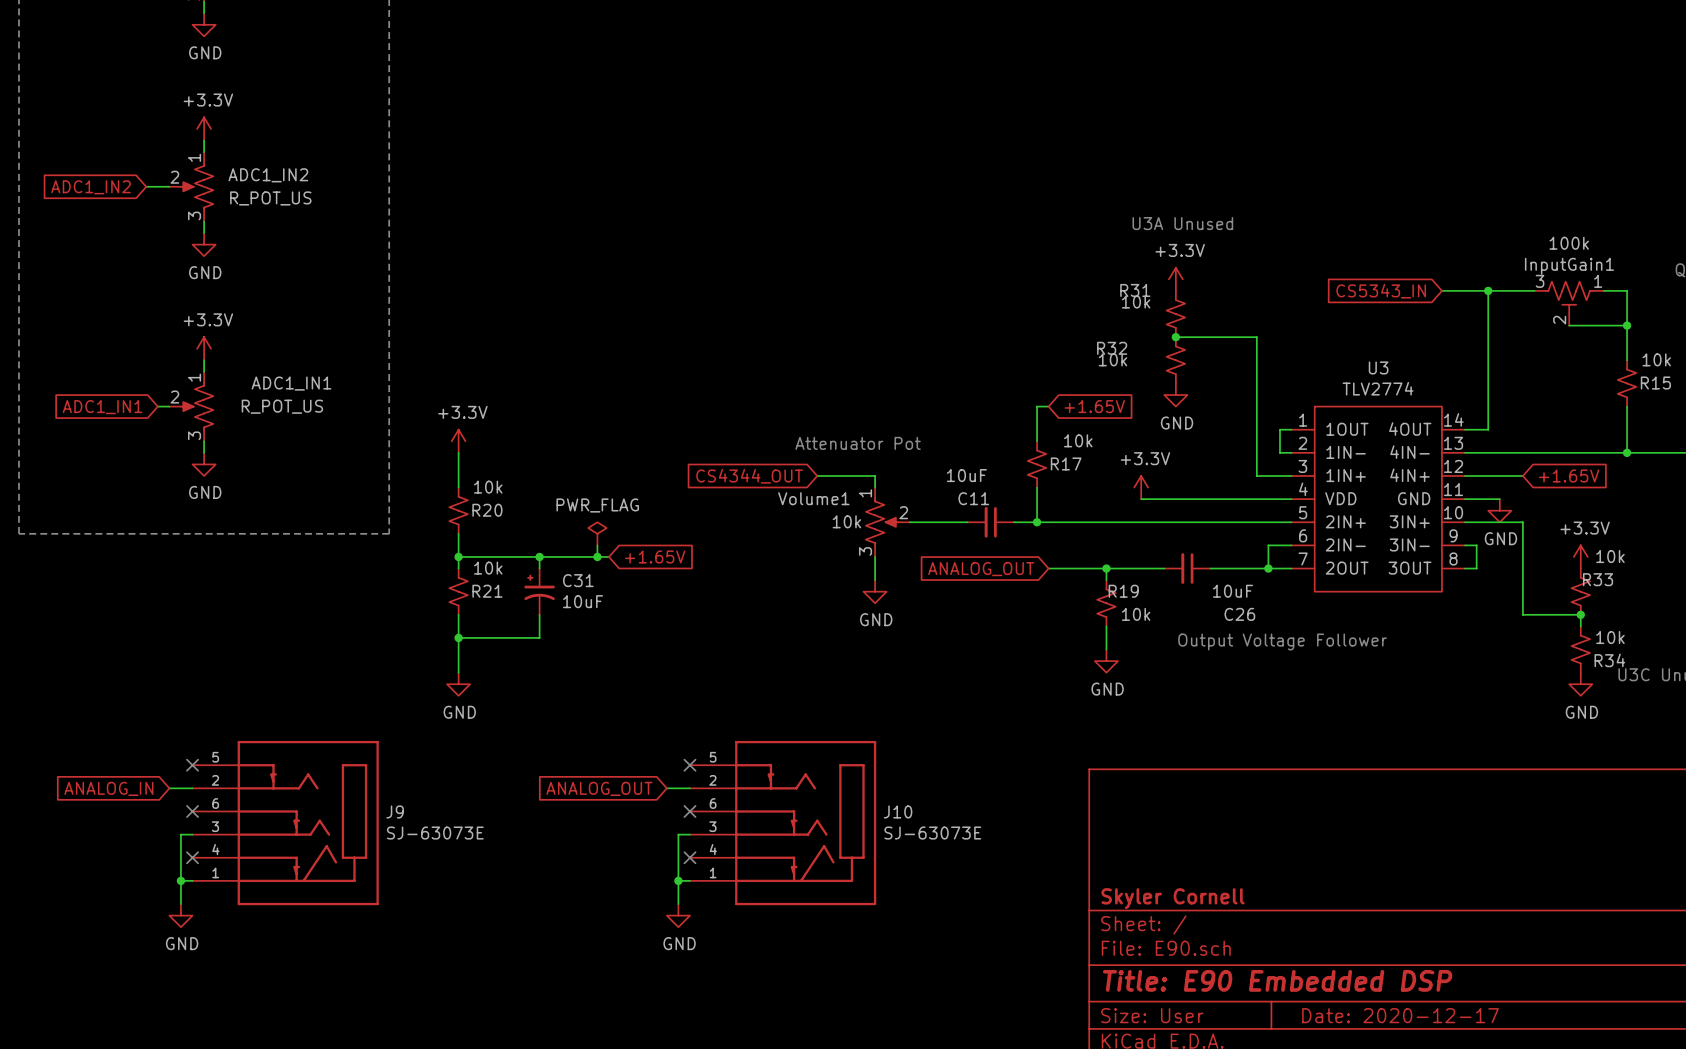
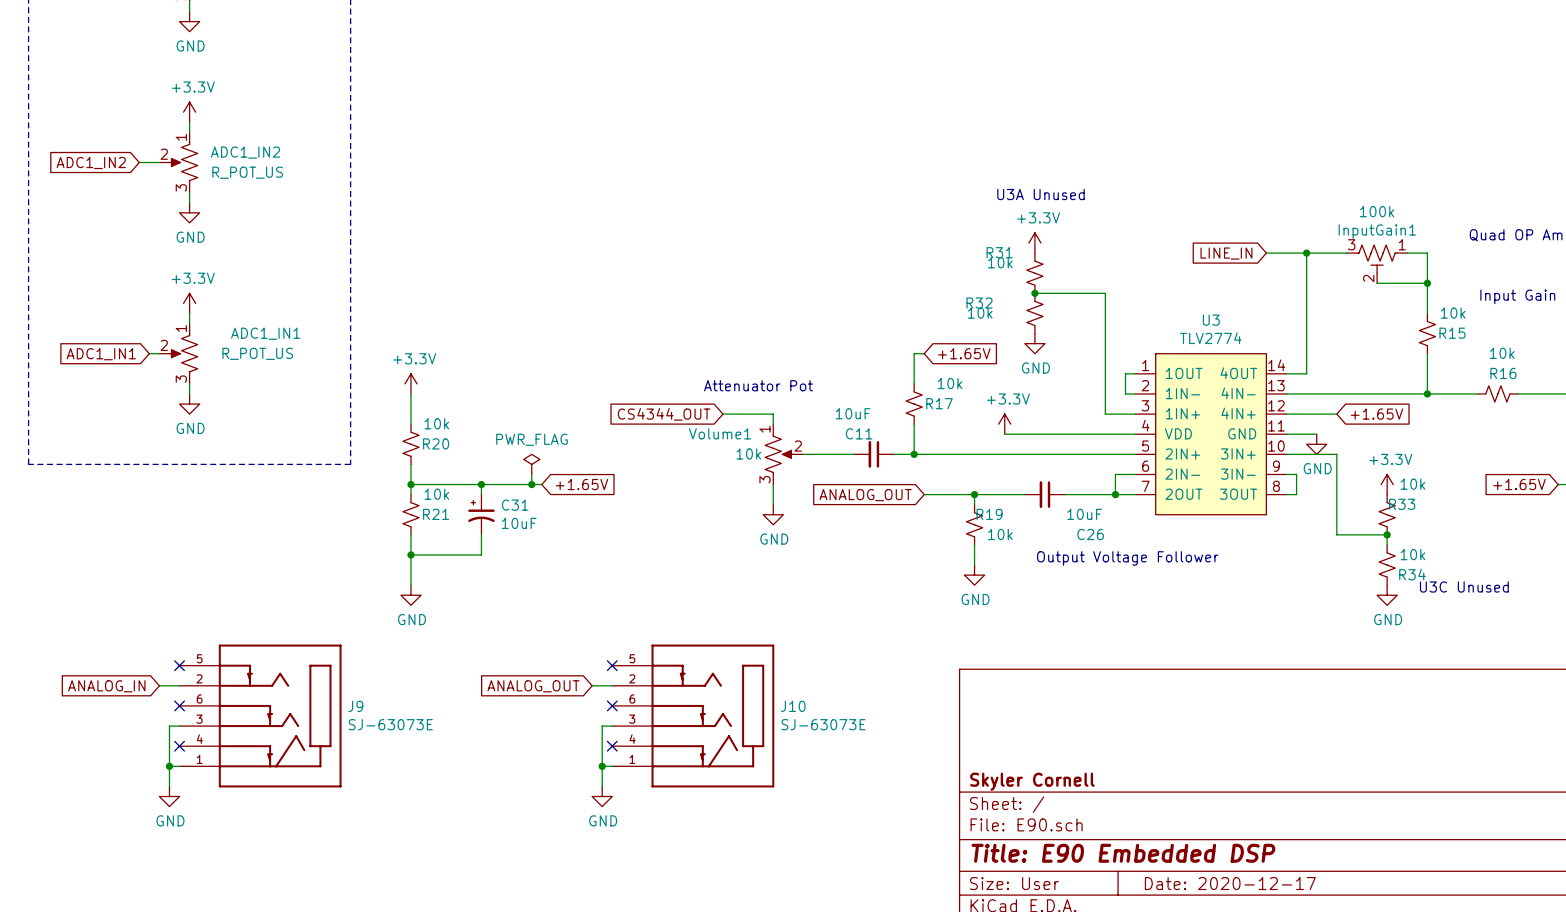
global label: CS5343_IN (1381, 291) -> LINE_IN (1226, 253)

